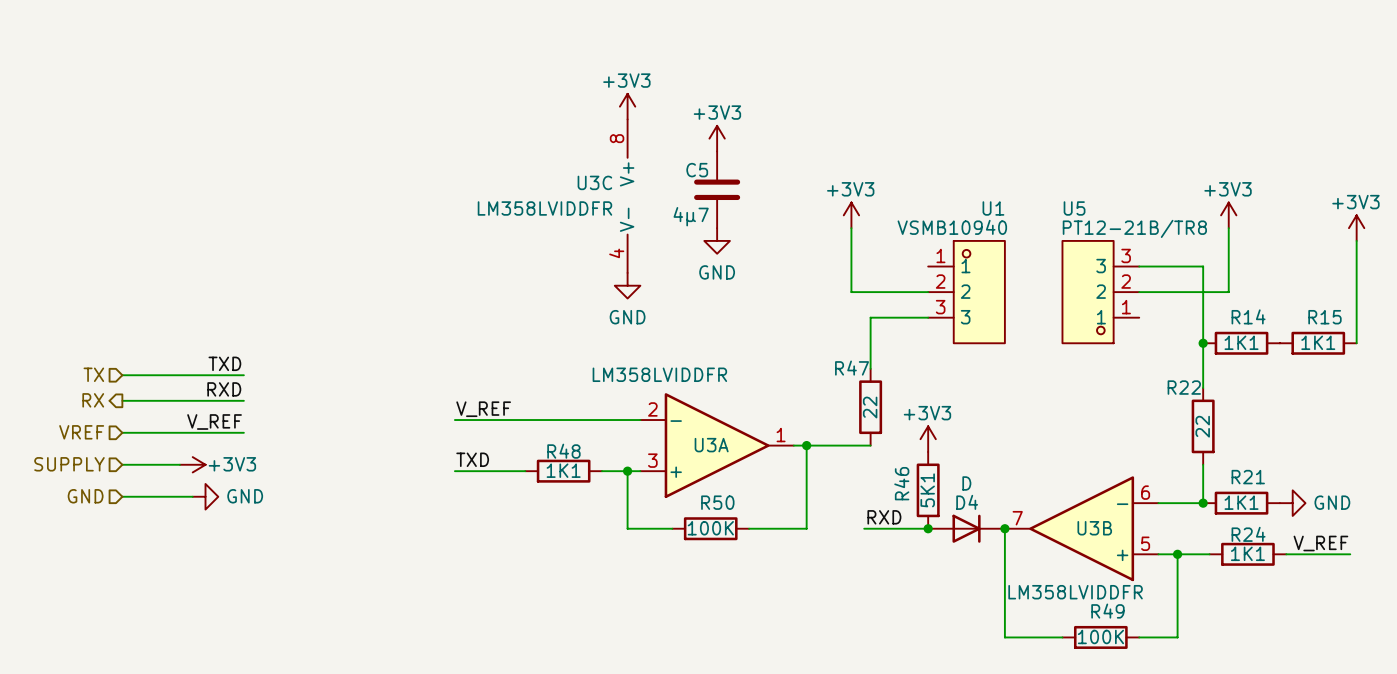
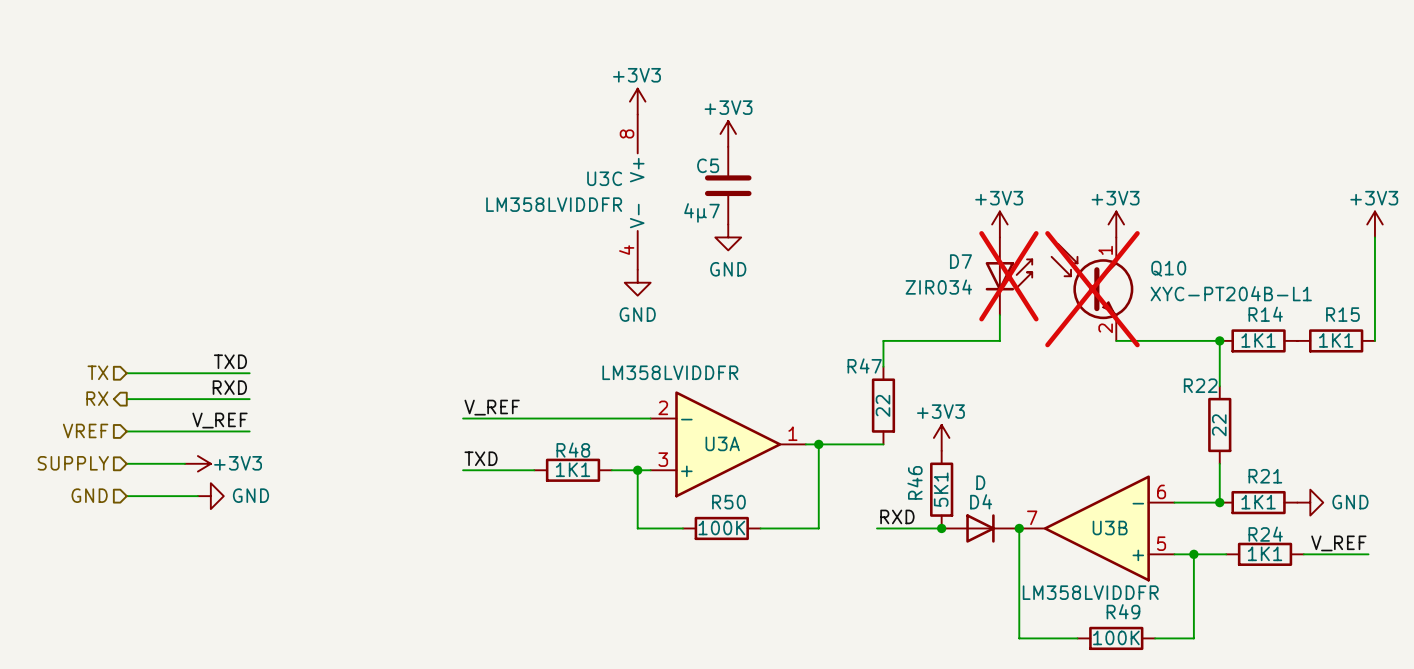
power symbol: +3V3 (851, 215) -> none
power symbol: +3V3 (1228, 215) -> none
wire: (851, 228) (851, 292) (928, 292) -> none
power symbol: none -> +3V3 (999, 224)
power symbol: none -> +3V3 (1116, 224)
wire: (1228, 228) (1228, 292) (1139, 292) -> none
wire: (1139, 266) (1203, 266) (1203, 343) -> (1116, 340) (1219, 340)
D7: none -> ZIR034 (1008, 276)
U1: VSMB10940 (966, 292) -> none
Q10: none -> XYC-PT204B-L1 (1092, 289)
U5: PT12-21B/TR8 (1100, 292) -> none
wire: (928, 317) (870, 317) (870, 343) -> (999, 315) (999, 340) (883, 340)

